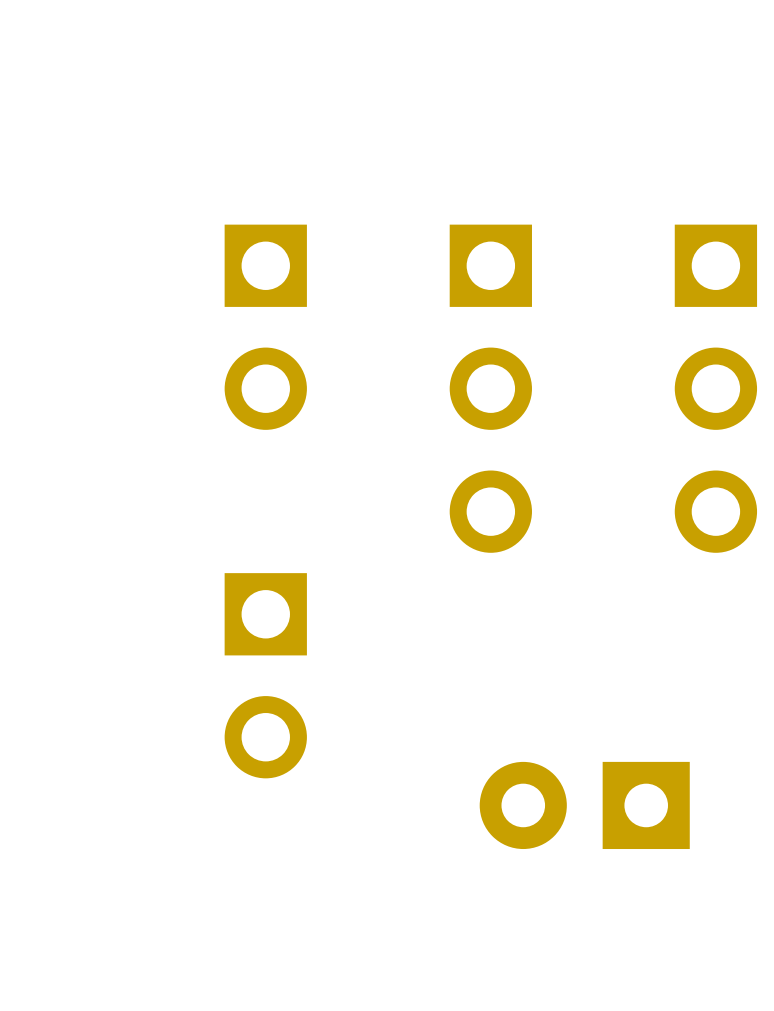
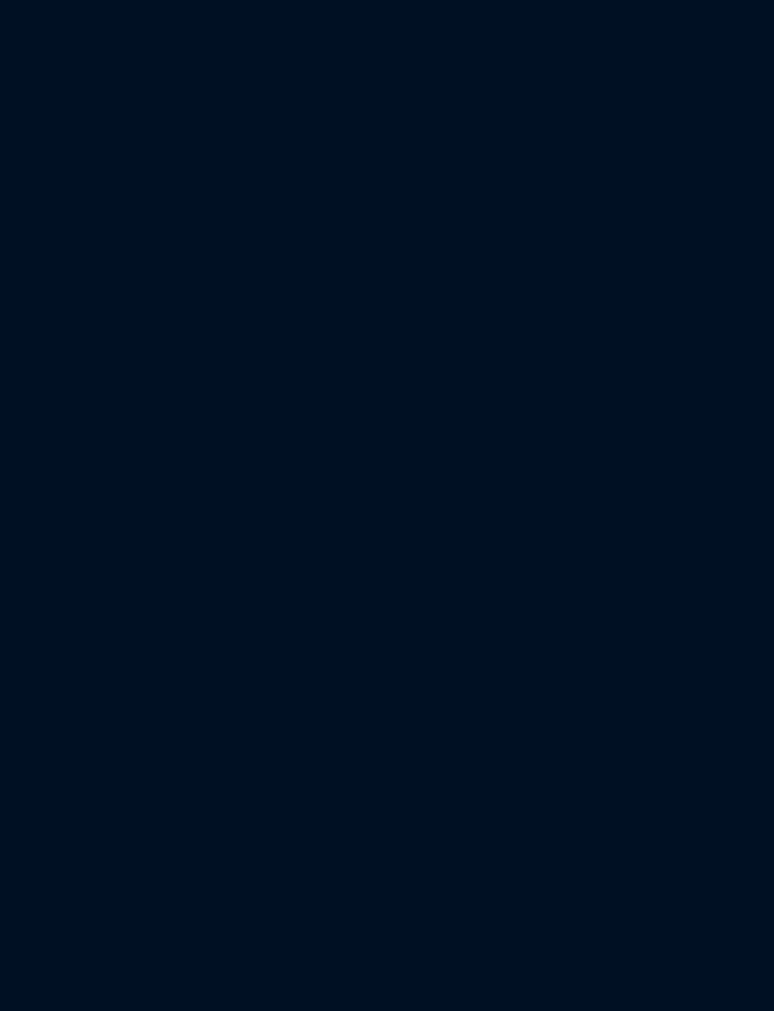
part: (265, 327) -> none
part: (490, 388) -> none
part: (715, 388) -> none
part: (265, 675) -> none
part: (584, 805) -> none

